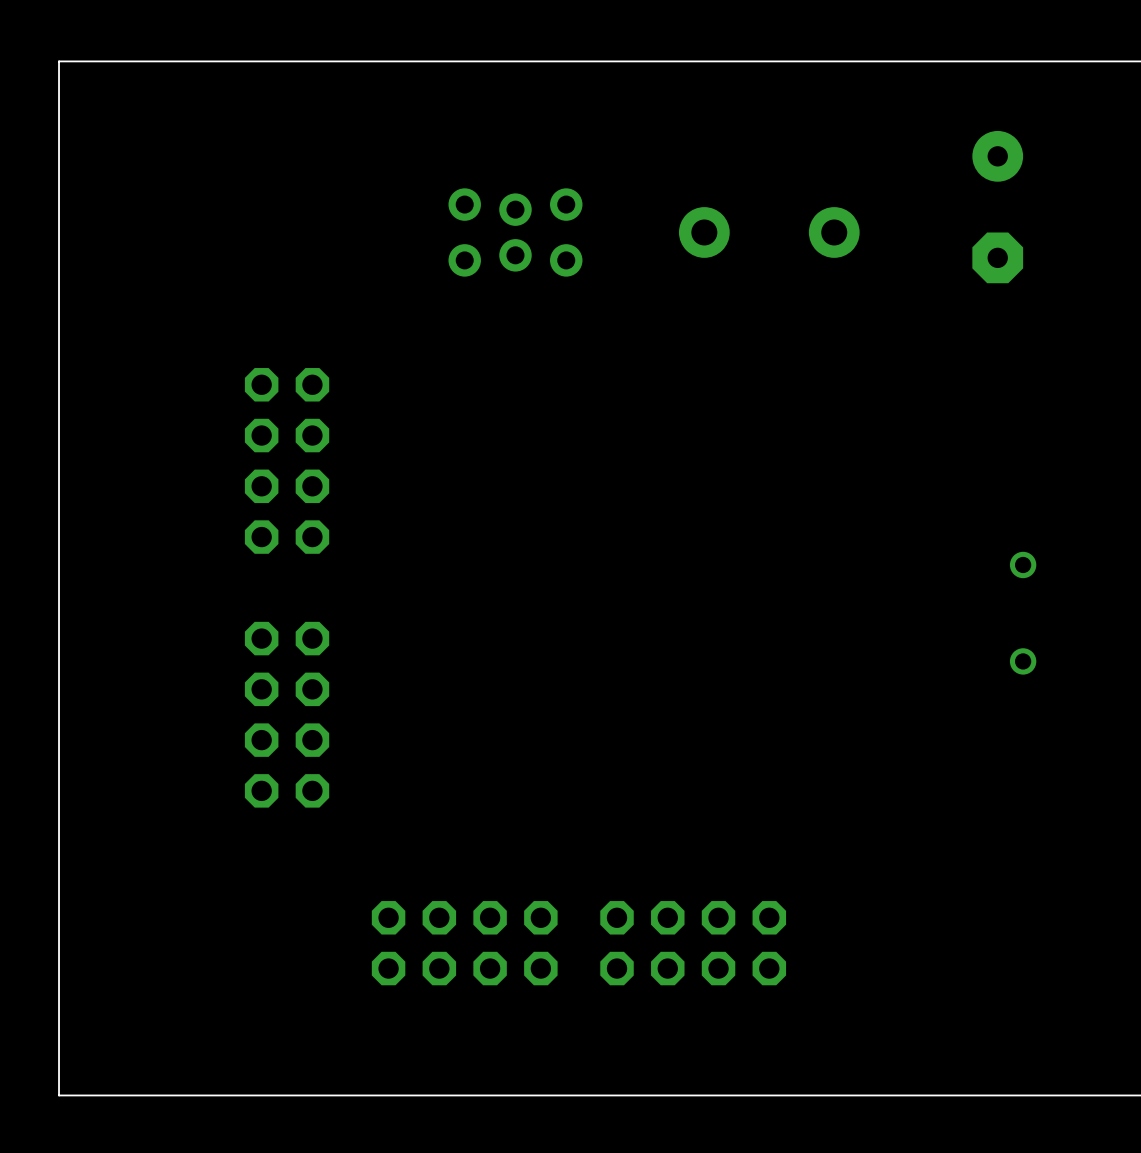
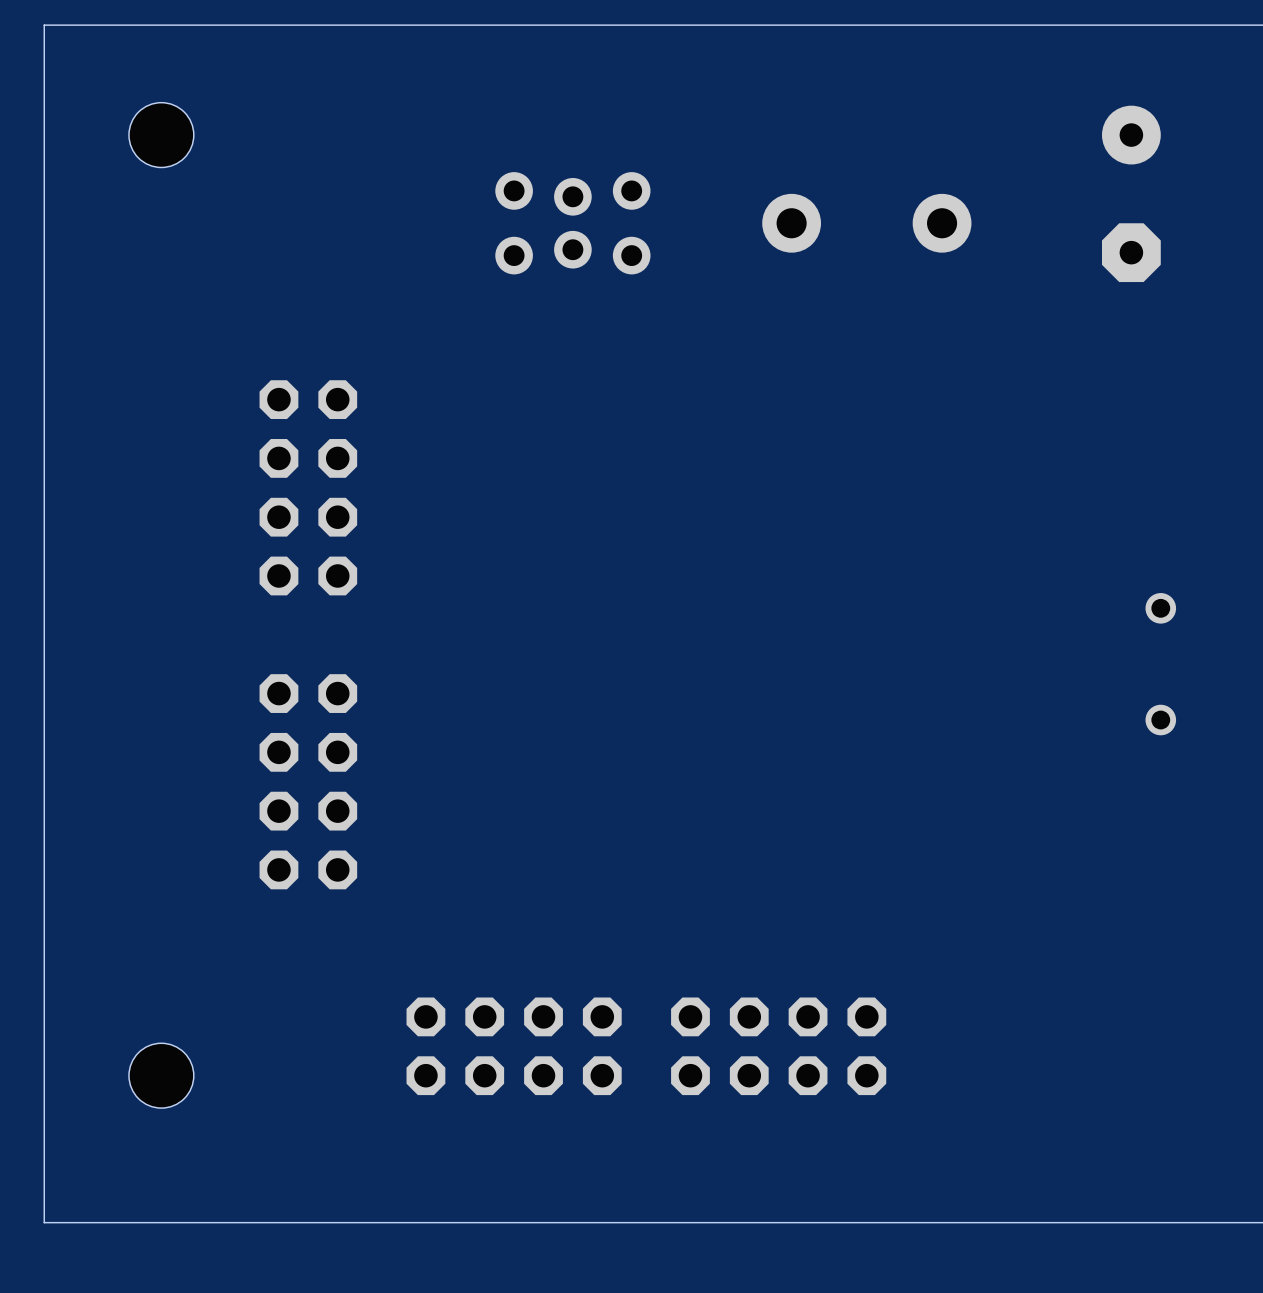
part: none -> (161, 135)
part: none -> (161, 1075)

